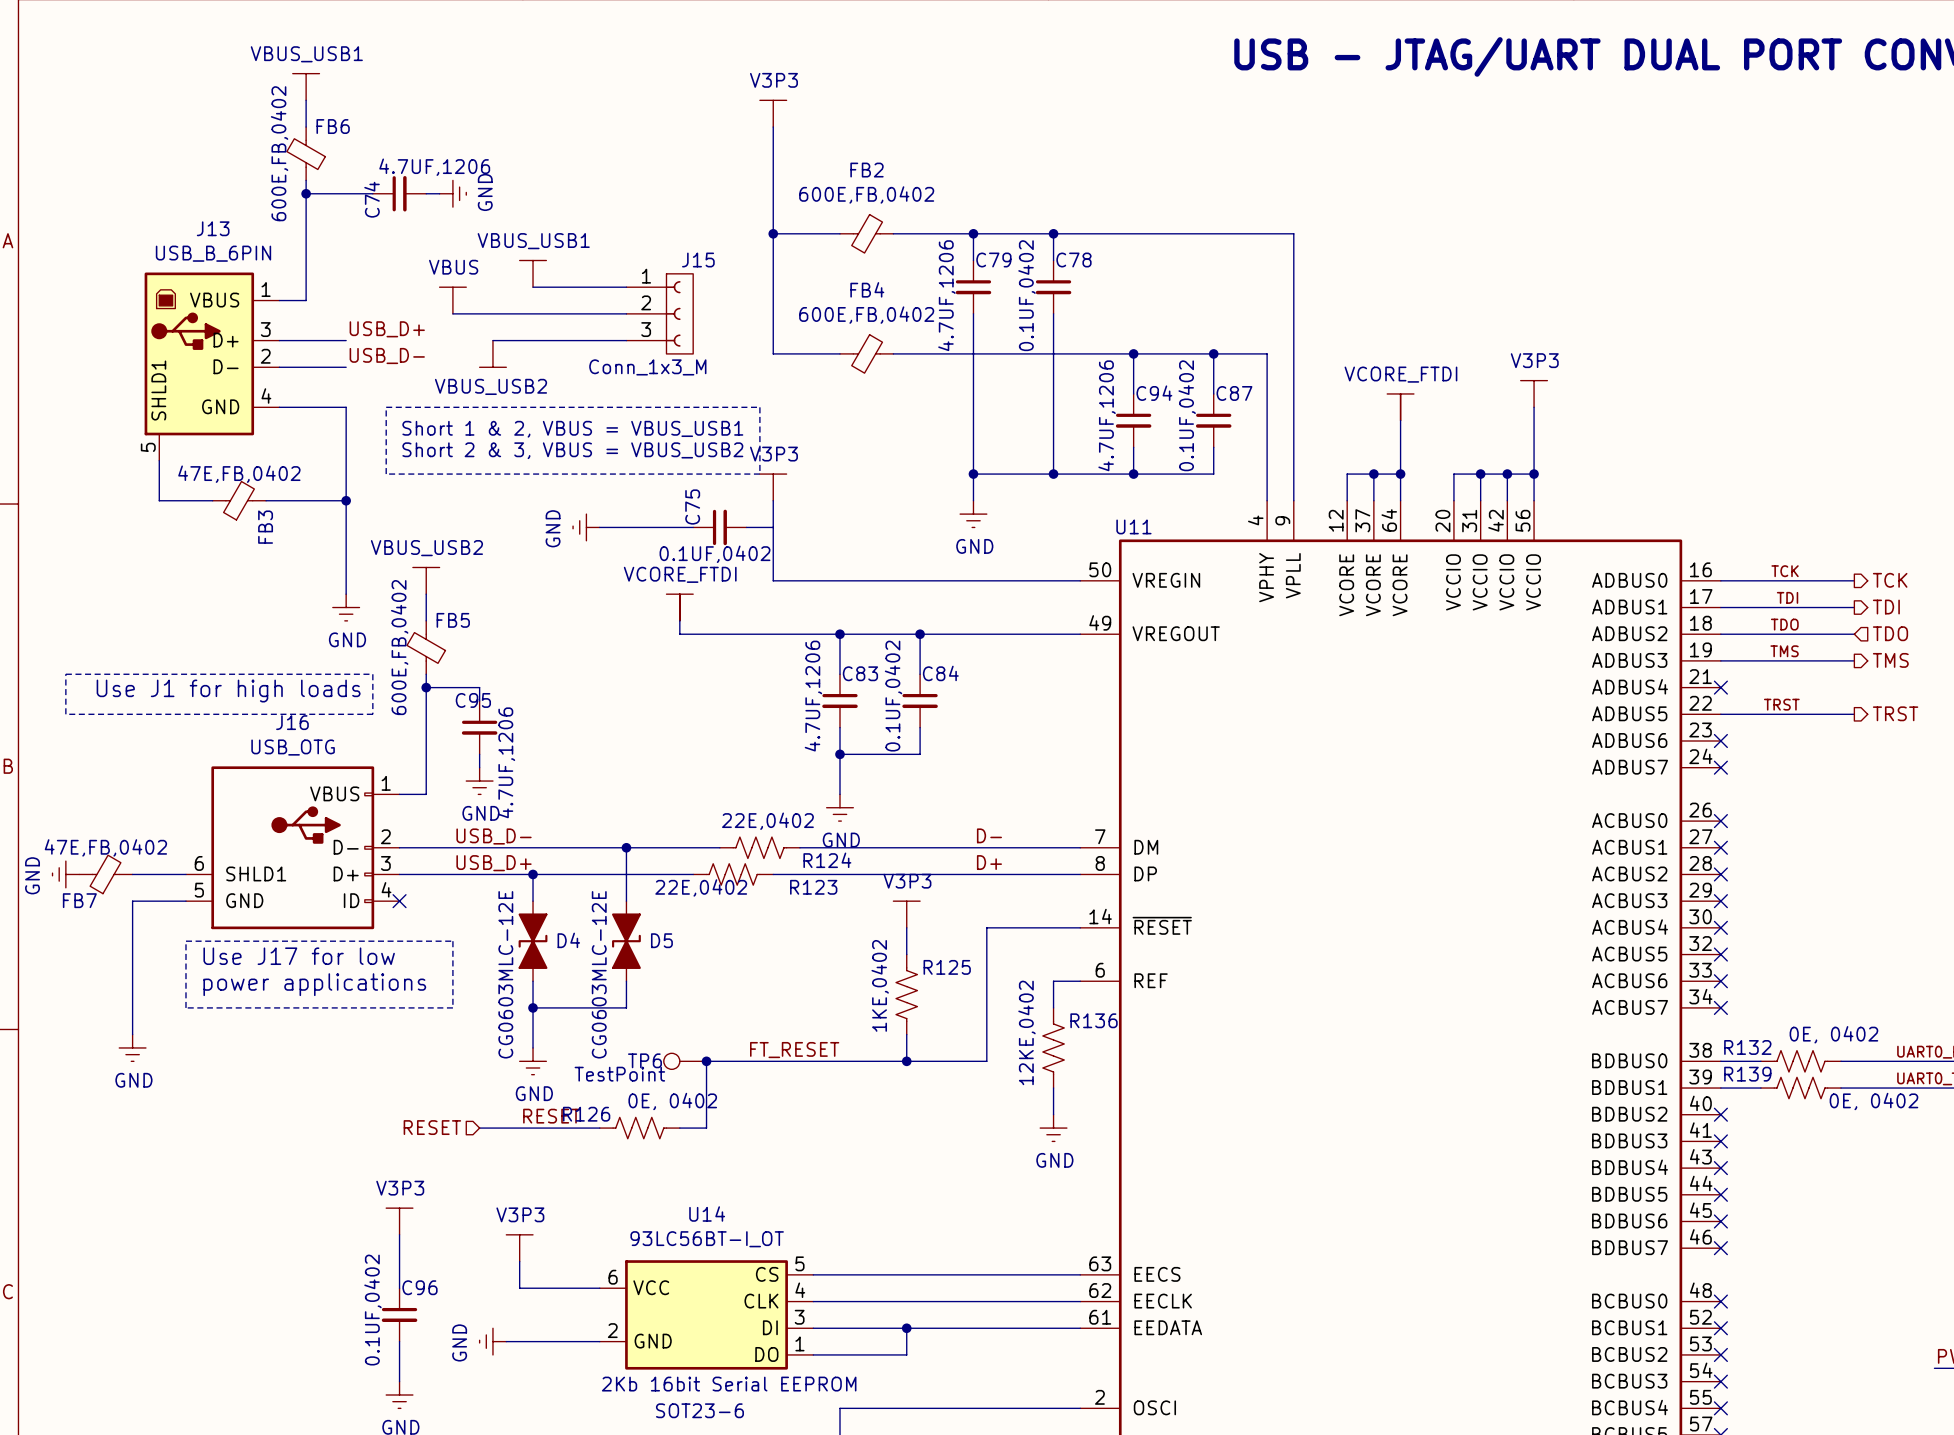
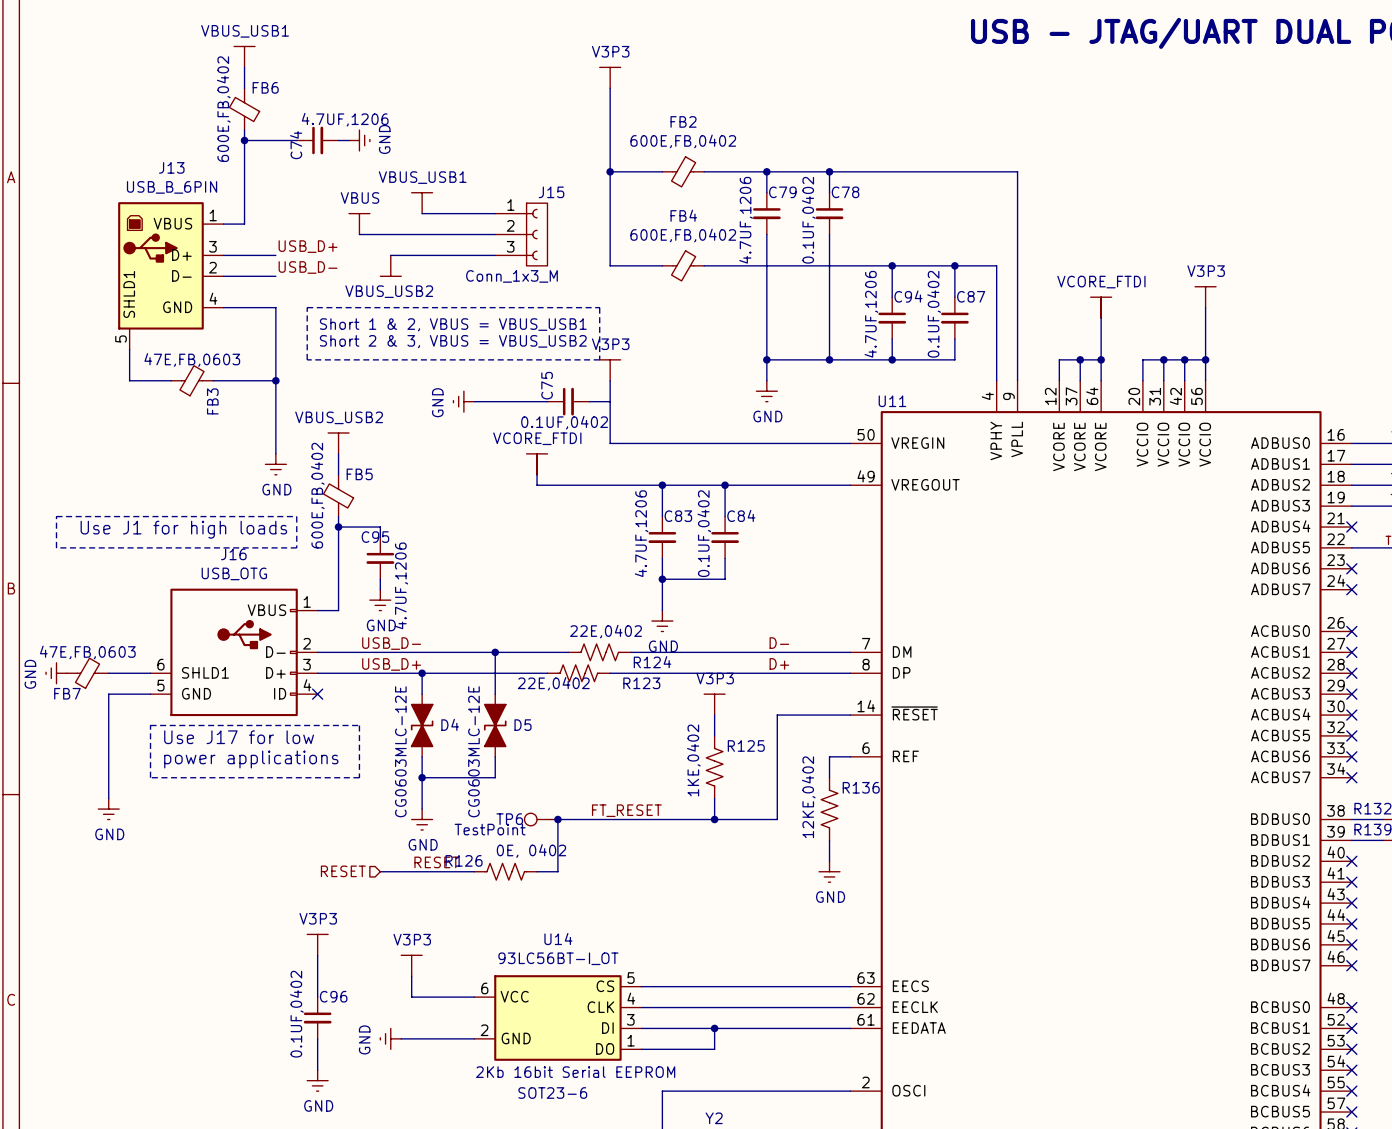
FB3 value: 47E,FB,0402 (239, 474) -> 47E,FB,0603 (192, 359)
FB7 value: 47E,FB,0402 (105, 847) -> 47E,FB,0603 (87, 652)

